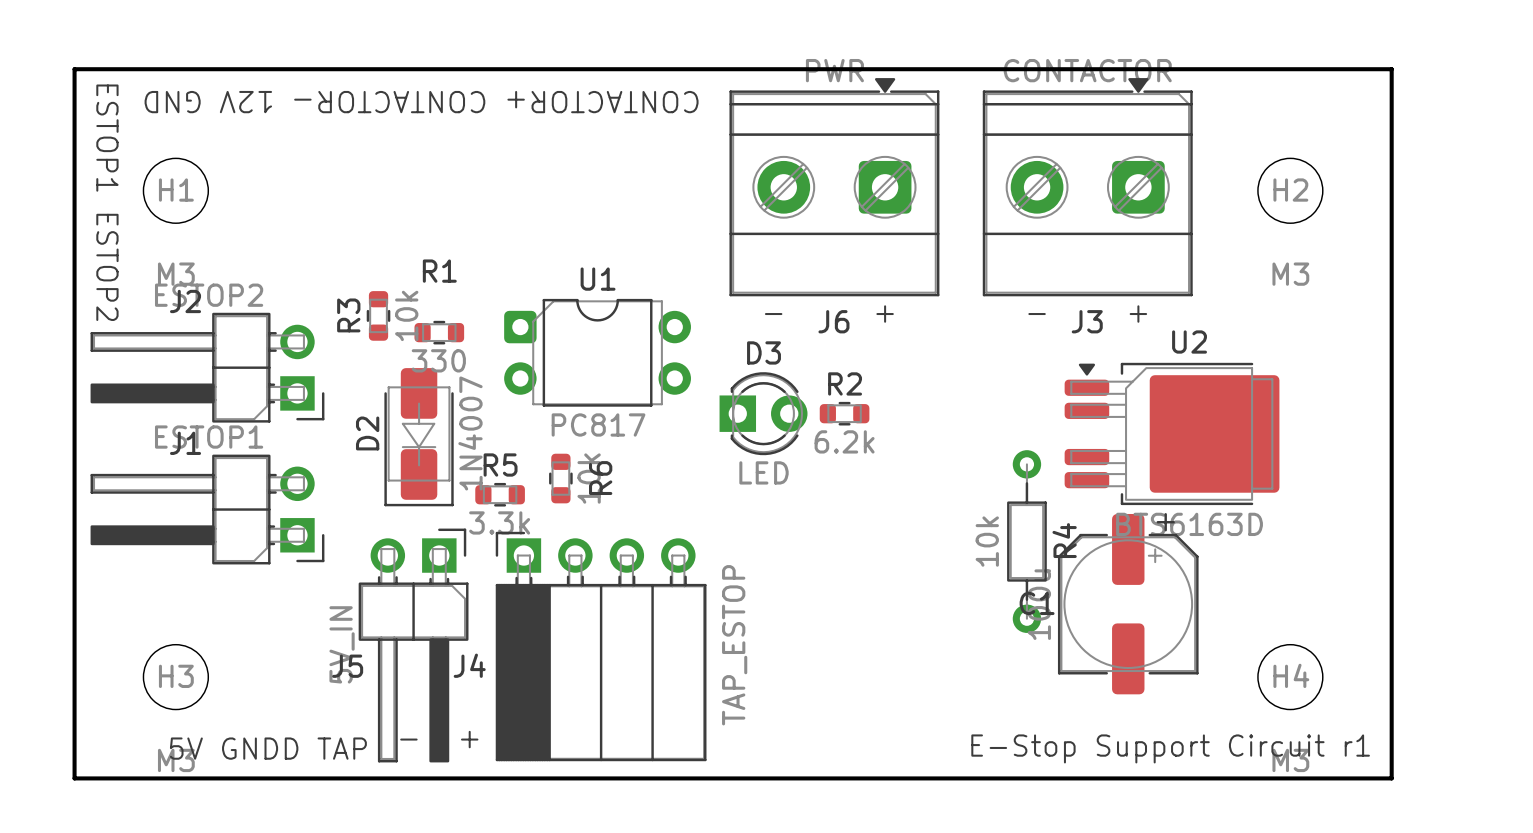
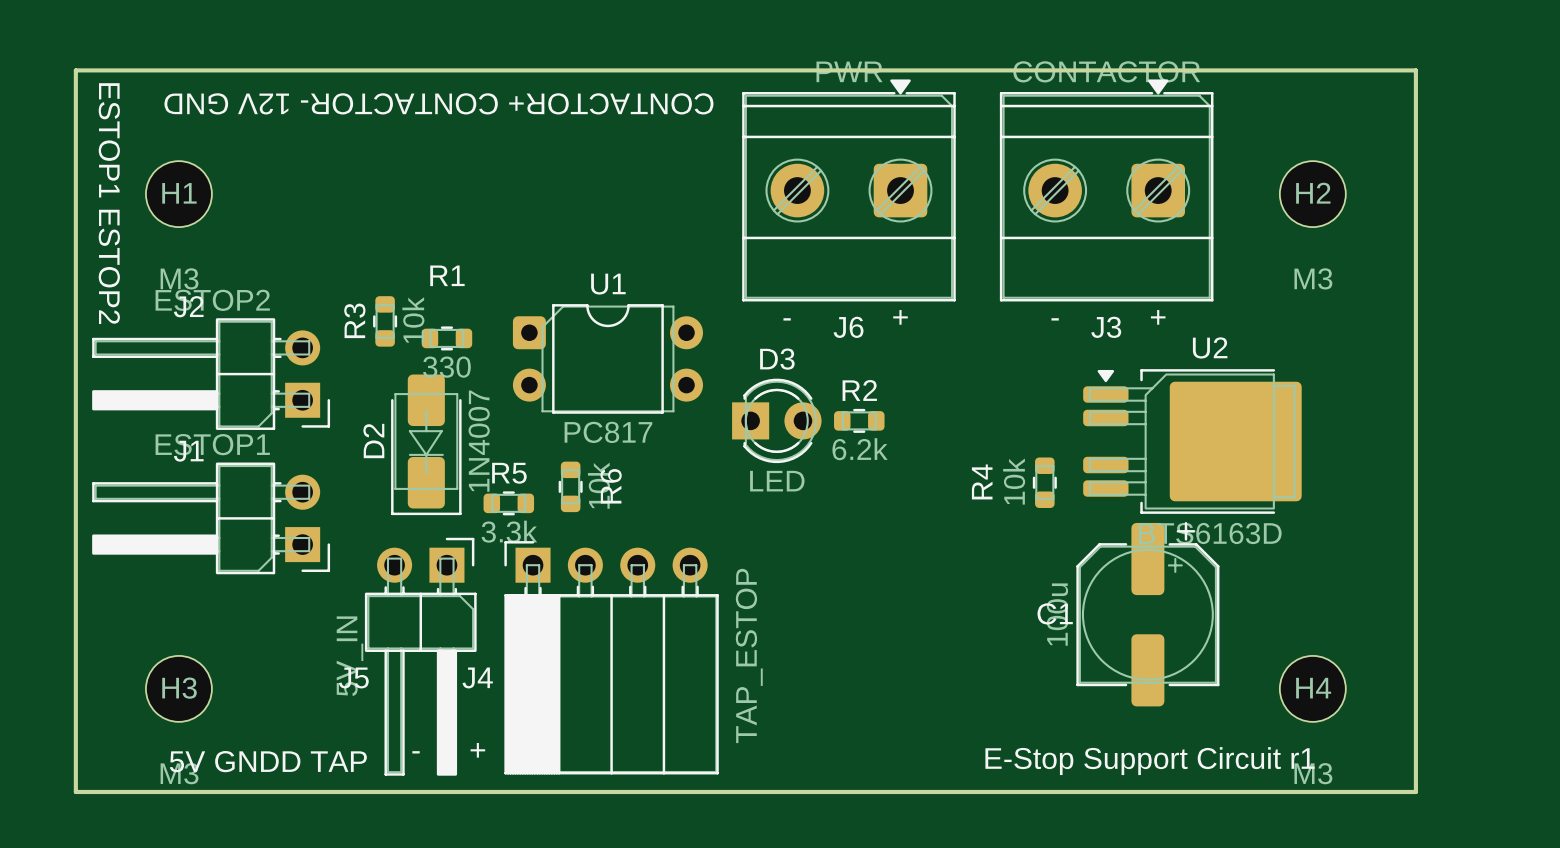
R4 footprint: [1007, 450, 1047, 633] -> [1032, 457, 1057, 508]
R4 name position: R4 (1064, 540) -> R4 (982, 481)

